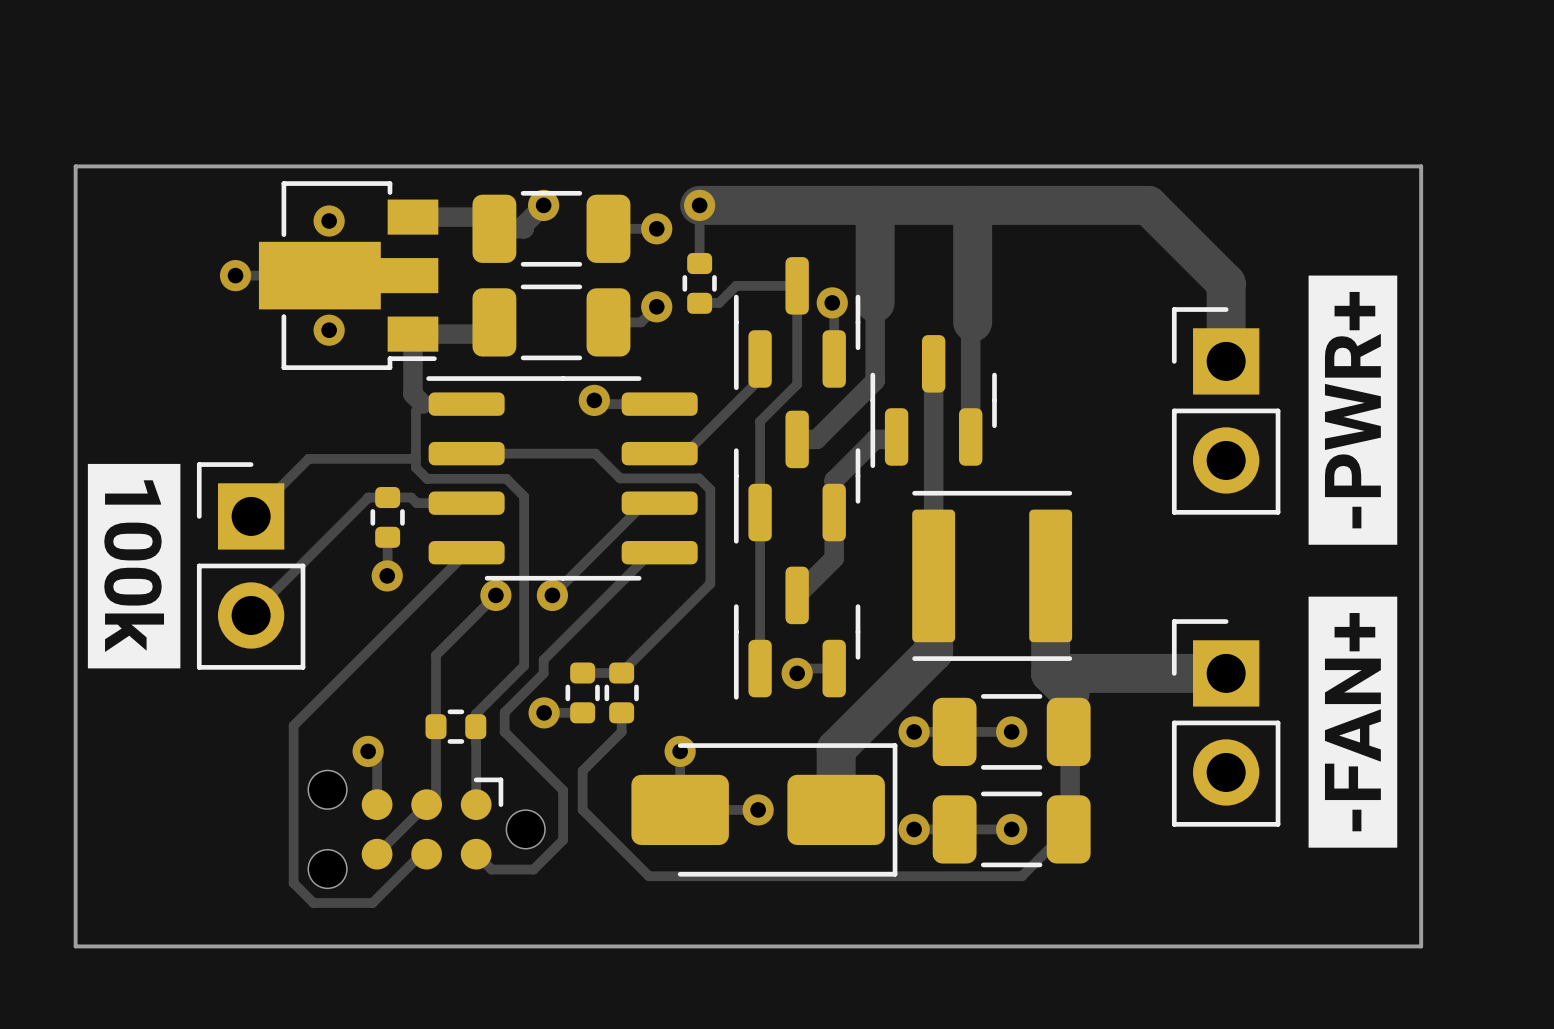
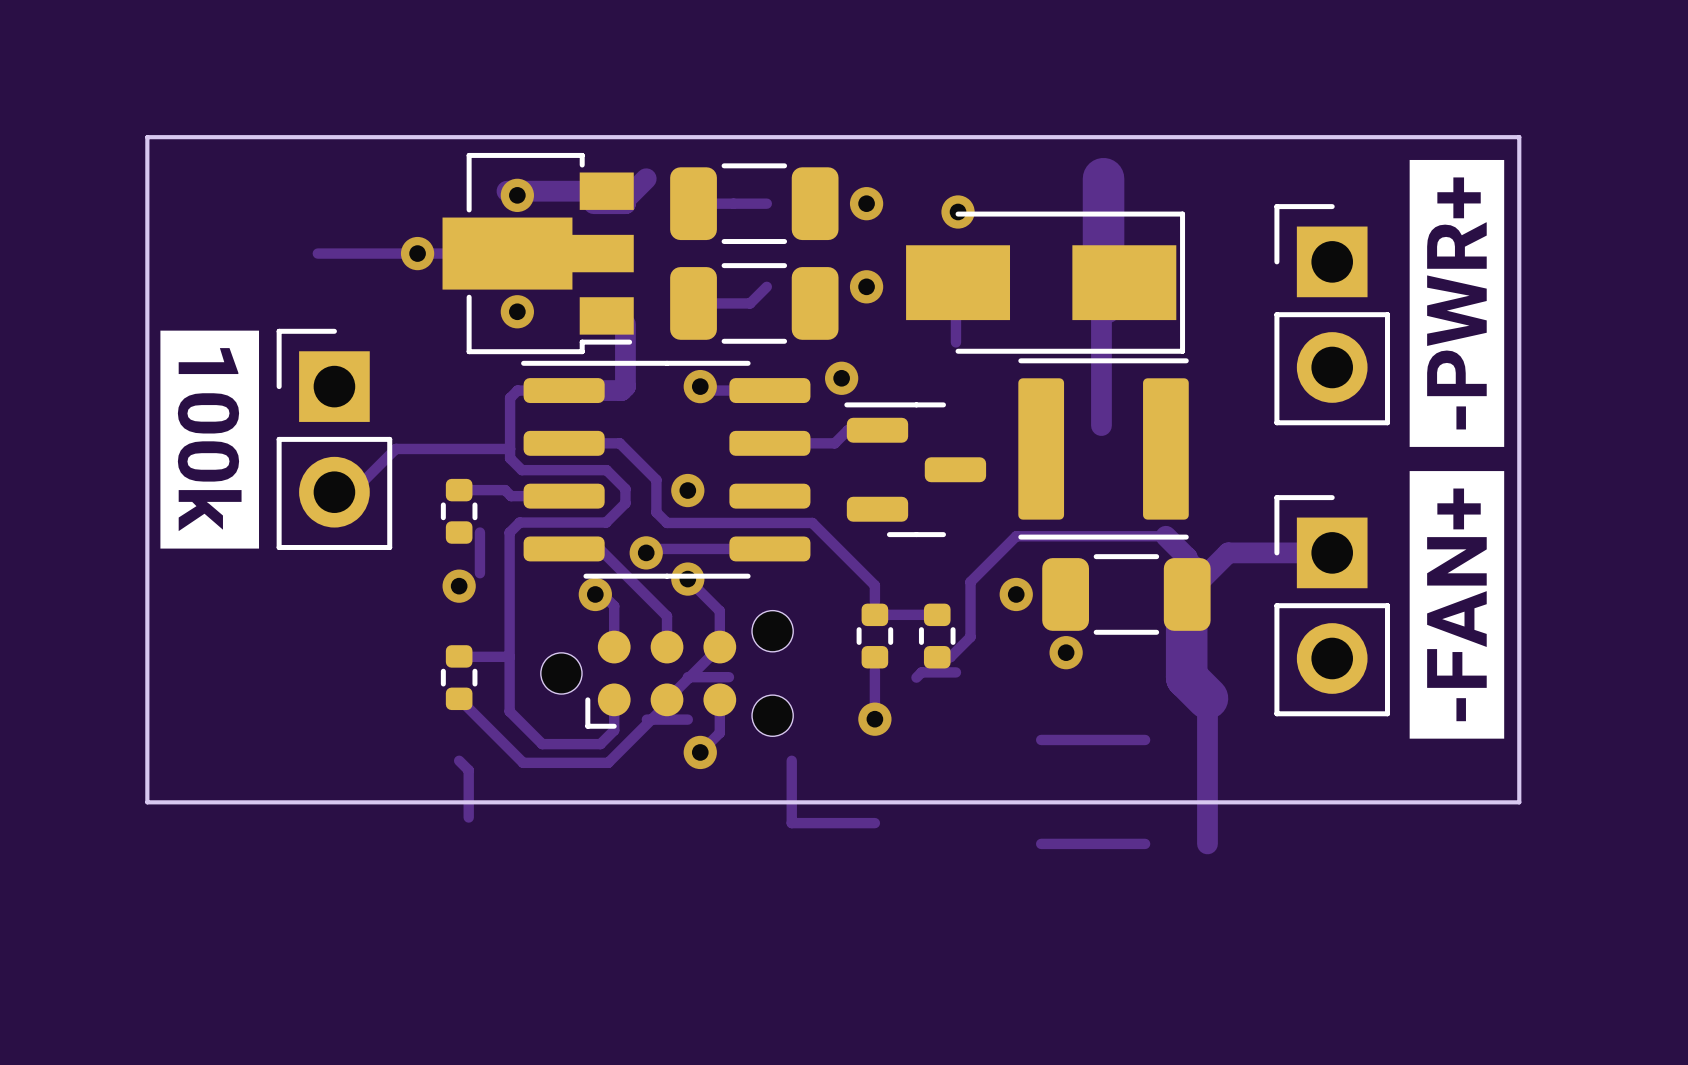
board edge: (1362, 166) (1421, 166) (1421, 946) (75, 946) (75, 790) -> (1519, 137) (1519, 802) (147, 802)
via: (543, 205) -> none
via: (699, 205) -> none
track: (875, 205) (875, 380) (816, 439) (797, 439) -> none
via: (329, 221) -> none
via: none -> (517, 195)
part: (551, 228) -> none
part: none -> (754, 203)
via: (656, 228) -> none
via: none -> (866, 203)
via: none -> (958, 211)
track: (699, 263) (699, 205) (1148, 205) (1226, 283) (1226, 361) -> none
via: (235, 275) -> none
via: none -> (417, 253)
part position: (348, 275) -> (538, 253)
part: (699, 283) -> none
track: (797, 283) (797, 384) (760, 421) (760, 668) -> none
track: (797, 285) (736, 285) (719, 302) (699, 302) -> none
via: (832, 302) -> none
part: none -> (1045, 282)
via: (656, 306) -> none
via: none -> (866, 286)
track: (489, 322) (477, 334) (412, 334) (412, 394) (422, 404) -> none
part: (551, 322) -> none
part: none -> (754, 303)
part: (797, 323) -> none
via: (329, 330) -> none
via: none -> (517, 311)
track: none -> (625, 324) (625, 386) (621, 390) (604, 390)
track: (933, 363) (933, 651) (836, 749) (836, 809) -> none
track: (758, 380) (685, 453) -> (877, 430) (847, 430) (834, 443) (797, 443)
via: none -> (841, 378)
part: (933, 401) -> none
part position: (1226, 410) -> (1332, 314)
drawing position: (1352, 410) -> (1456, 303)
track: (894, 439) (875, 439) (834, 480) (834, 558) (797, 595) -> none
track: (518, 453) (595, 453) (620, 478) (699, 478) (710, 489) (710, 583) (621, 672) -> (619, 443) (656, 479) (656, 512) (667, 522) (812, 522) (874, 585) (874, 601)
part: none -> (1103, 448)
part rotation: 0° (797, 477) -> 90° clockwise (915, 469)
part footprint: [912, 490, 1073, 661] -> [1042, 554, 1211, 635]
track: (368, 497) (251, 614) -> none
via: none -> (687, 490)
track: (644, 503) (552, 595) -> none
track: (524, 509) (524, 665) (475, 714) (475, 742) -> (625, 503) (606, 522) (519, 522) (509, 532) (509, 711) (542, 744) (600, 744) (614, 730) (614, 699)
part position: (387, 517) -> (459, 511)
track: (466, 552) (293, 725) (293, 883) (313, 902) (372, 902) (426, 848) -> (564, 548) (599, 548) (667, 616) (667, 647)
track: (650, 552) (543, 659) (543, 673) (504, 712) (504, 731) (563, 790) (563, 839) (533, 869) (491, 869) (476, 854) -> none
track: none -> (769, 548) (650, 548) (646, 552)
via: none -> (646, 552)
part position: (251, 565) -> (334, 439)
drawing position: (134, 566) -> (209, 439)
via position: (387, 575) -> (459, 586)
track: none -> (687, 579) (719, 611) (719, 647) (668, 698)
track: (495, 595) (436, 655) (436, 800) -> none
via position: (552, 595) -> (687, 579)
via: none -> (1016, 594)
track: none -> (1186, 594) (1228, 552) (1332, 552) (1228, 552) (1187, 594) (1187, 557) (1165, 536) (1016, 536) (970, 581) (970, 637) (950, 657) (937, 657)
track: none -> (603, 595) (614, 606) (614, 647)
part: none -> (1332, 605)
track: none -> (874, 614) (936, 614)
part: (797, 633) -> none
part: none -> (874, 636)
part: none -> (937, 636)
via: none -> (1066, 652)
track: none -> (459, 656) (509, 656)
part footprint: [565, 662, 600, 724] -> [540, 610, 794, 737]
track: none -> (874, 670) (874, 719)
via: (797, 673) -> none
track: (1050, 673) (1206, 673) -> none
part: (621, 692) -> none
track: none -> (459, 698) (523, 762) (608, 762) (667, 704)
track: none -> (719, 699) (719, 732) (700, 752)
via: (544, 712) -> none
track: (621, 712) (621, 731) (582, 770) (582, 809) (648, 876) (1021, 876) (1068, 829) -> none
via: none -> (874, 719)
part: (1226, 722) -> none
drawing position: (1352, 722) -> (1456, 604)
part rotation: 0° (455, 726) -> 90° clockwise (459, 677)
part position: (455, 726) -> (459, 677)
via: (914, 731) -> none
part: (1011, 731) -> none
via: (1011, 731) -> none
track: (476, 742) (476, 804) -> none
via: none -> (700, 752)
via: (368, 751) -> none
via: (680, 751) -> none
track: (426, 804) (377, 854) -> none
via: (758, 809) -> none
part: (764, 809) -> none
part: (426, 829) -> none
via: (914, 829) -> none
part: (1011, 829) -> none
via: (1011, 829) -> none

